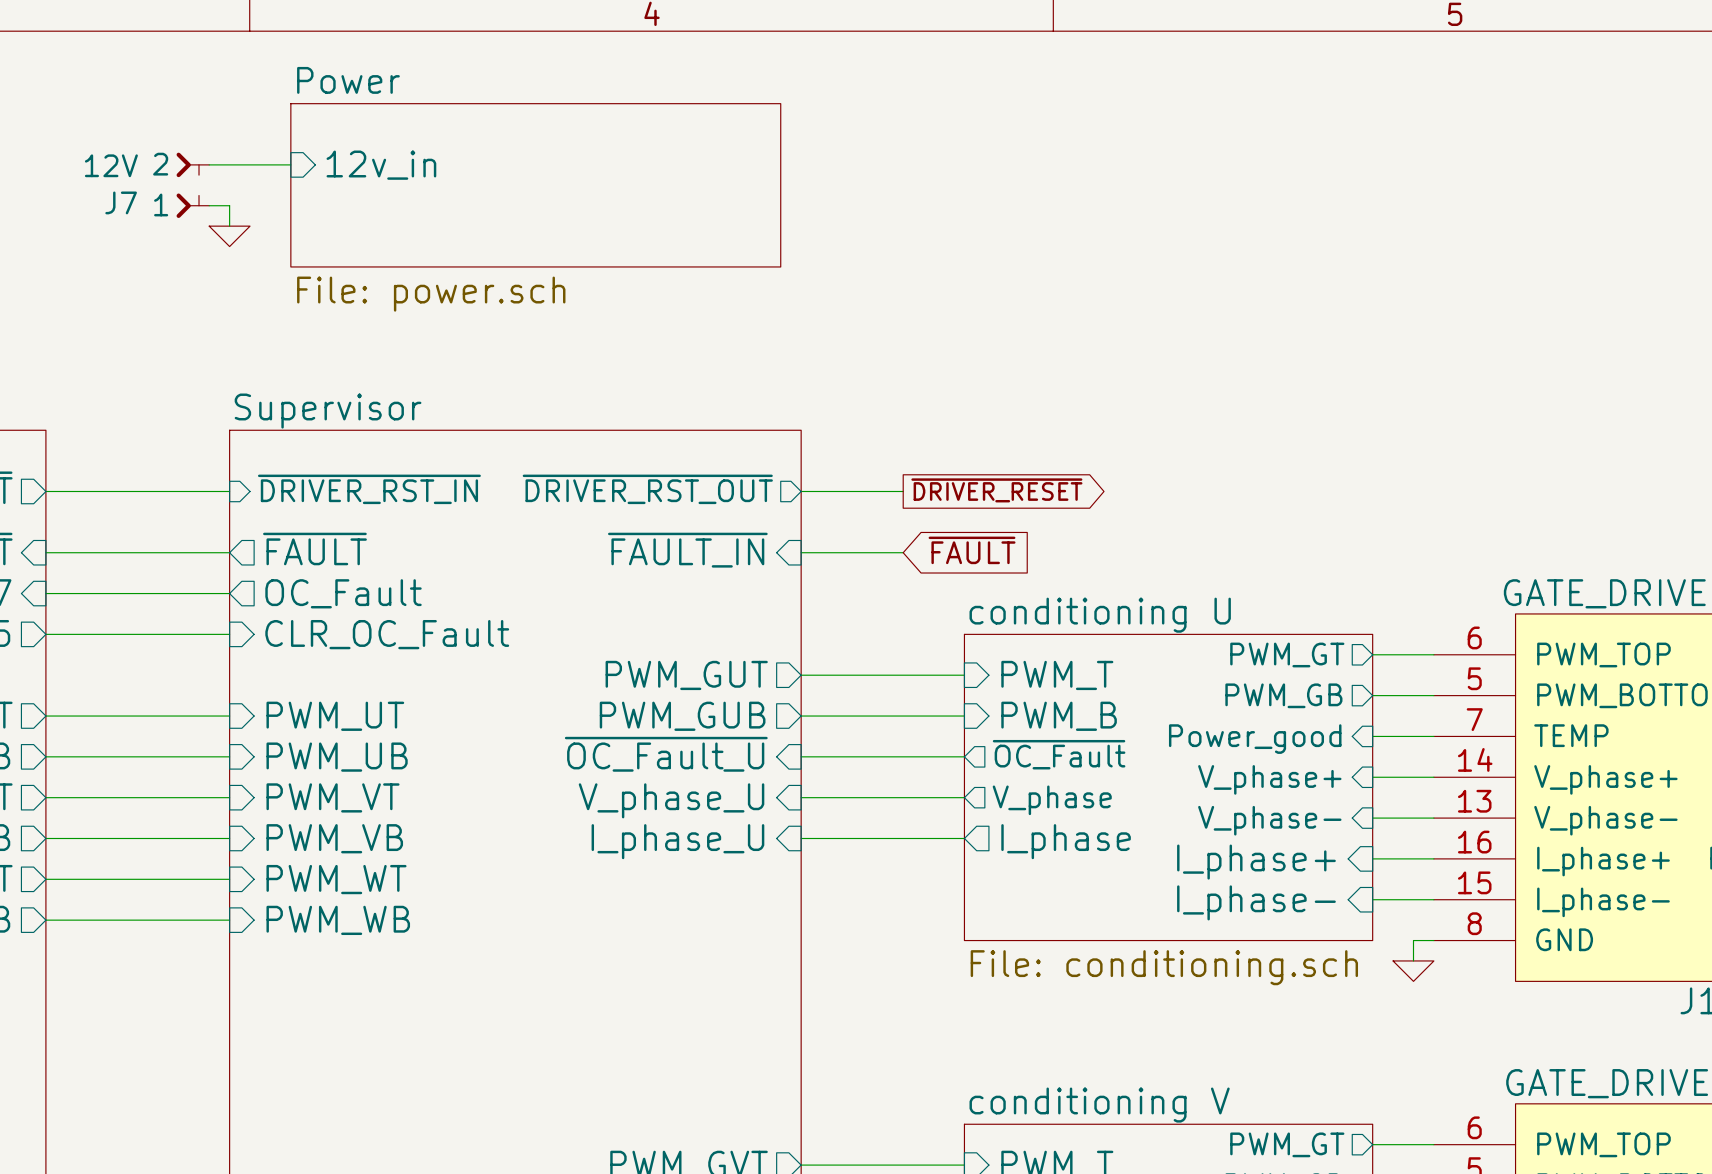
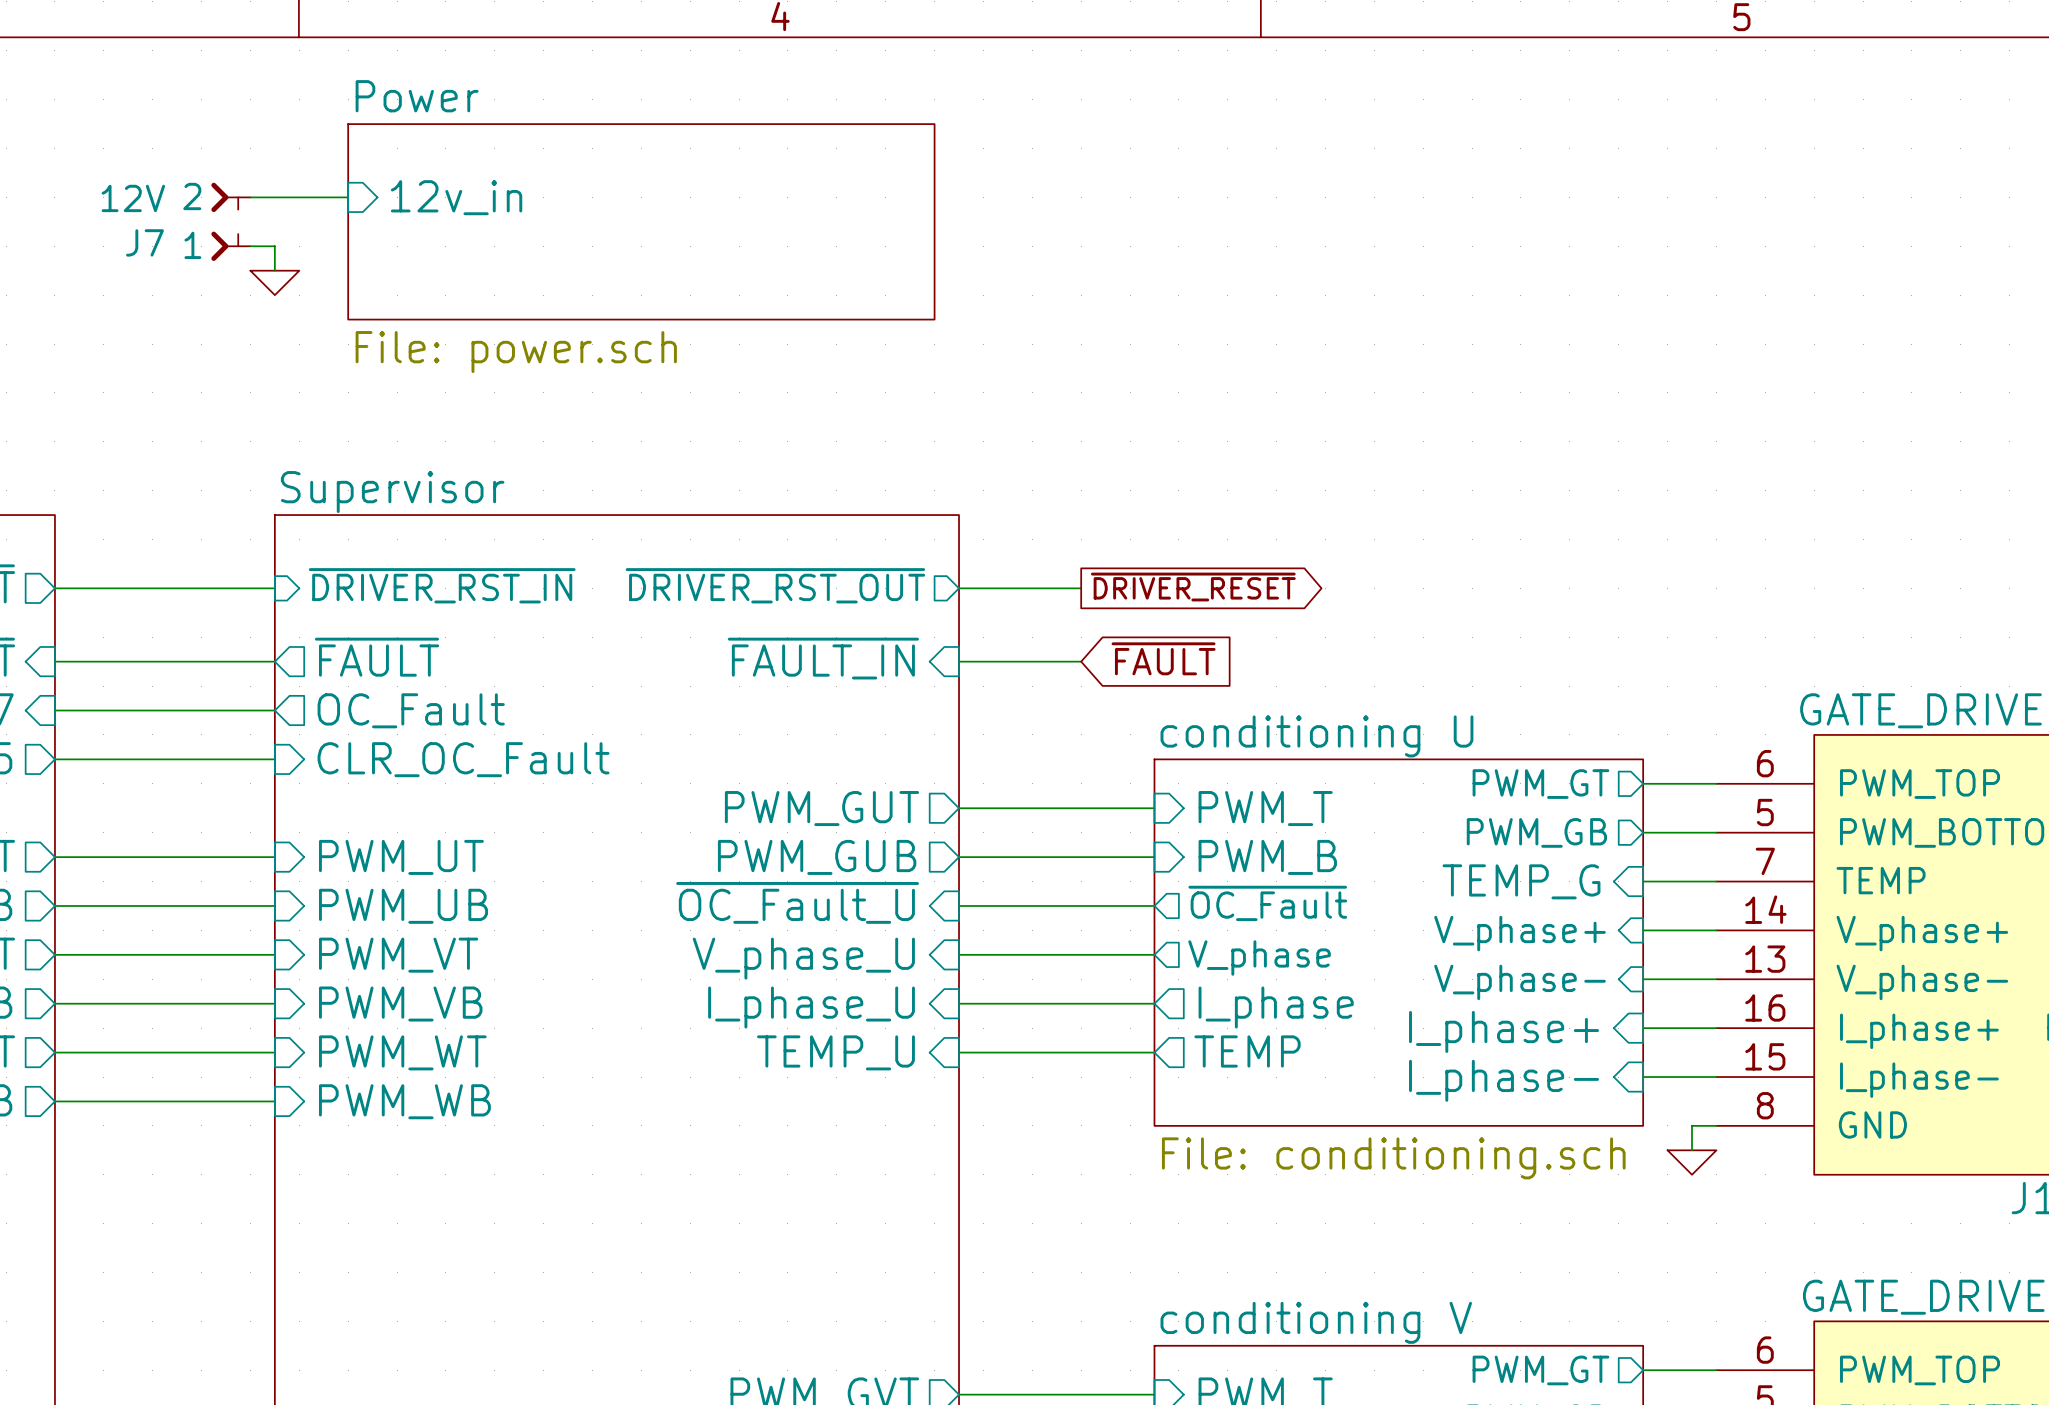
sheet pin: Power_good (1255, 739) -> TEMP_G (1521, 881)
sheet pin: none -> TEMP (1247, 1051)
sheet pin: none -> TEMP_U (835, 1052)
wire: none -> (959, 1052) (1154, 1052)

